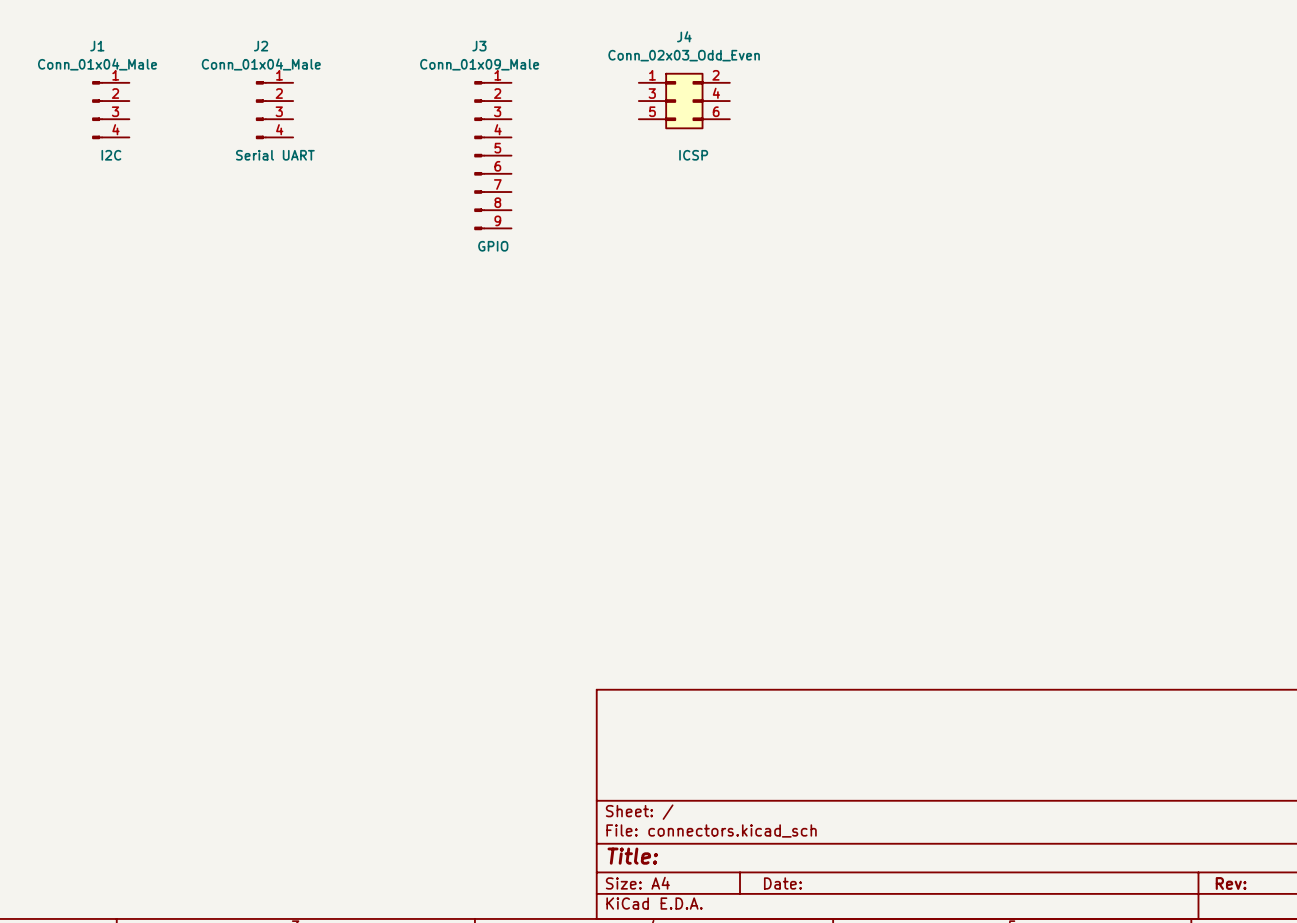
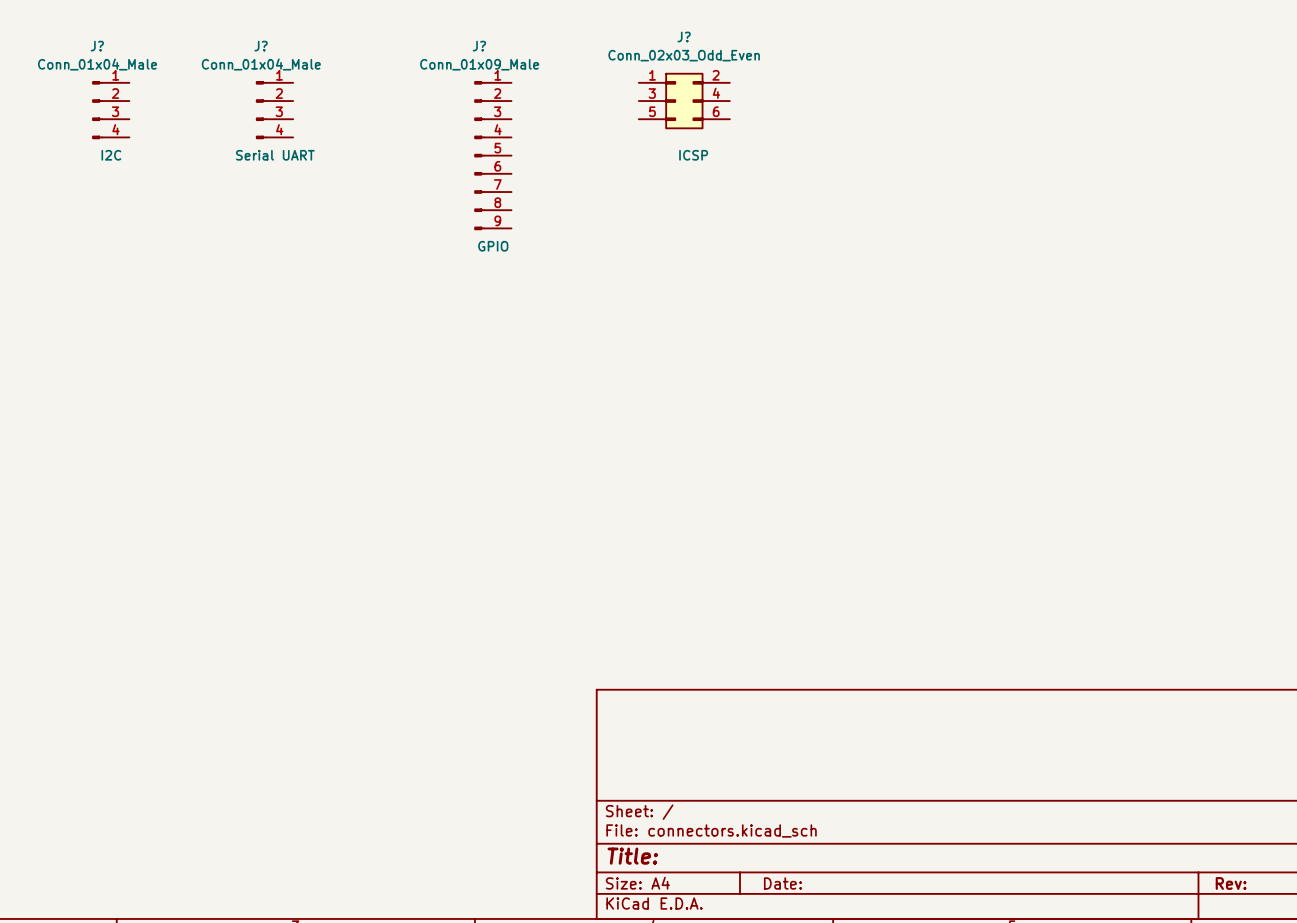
J4 name: J4 (684, 36) -> J? (684, 37)
J1 name: J1 (97, 46) -> J? (97, 46)
J2 name: J2 (261, 46) -> J? (261, 46)
J3 name: J3 (479, 46) -> J? (479, 46)

